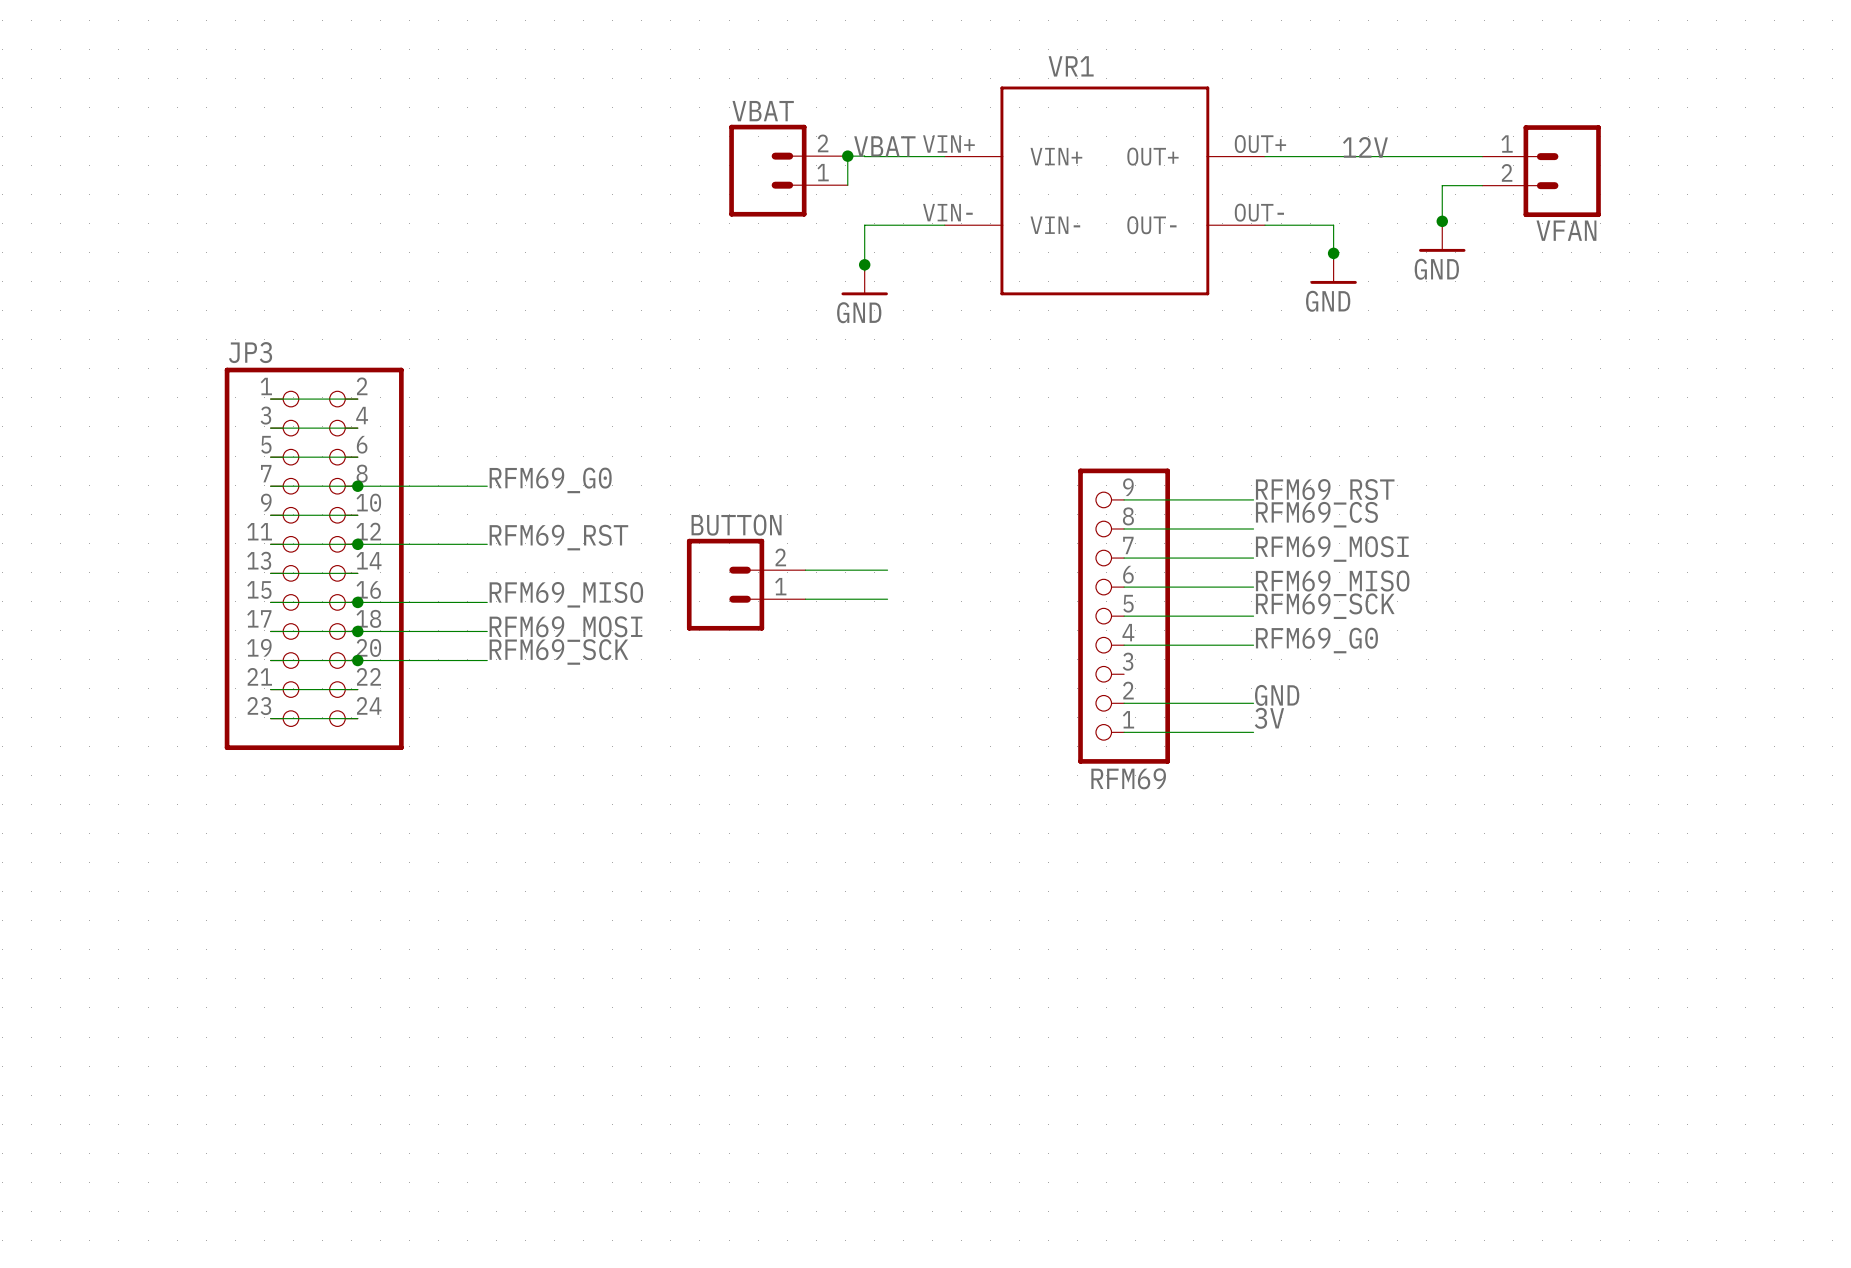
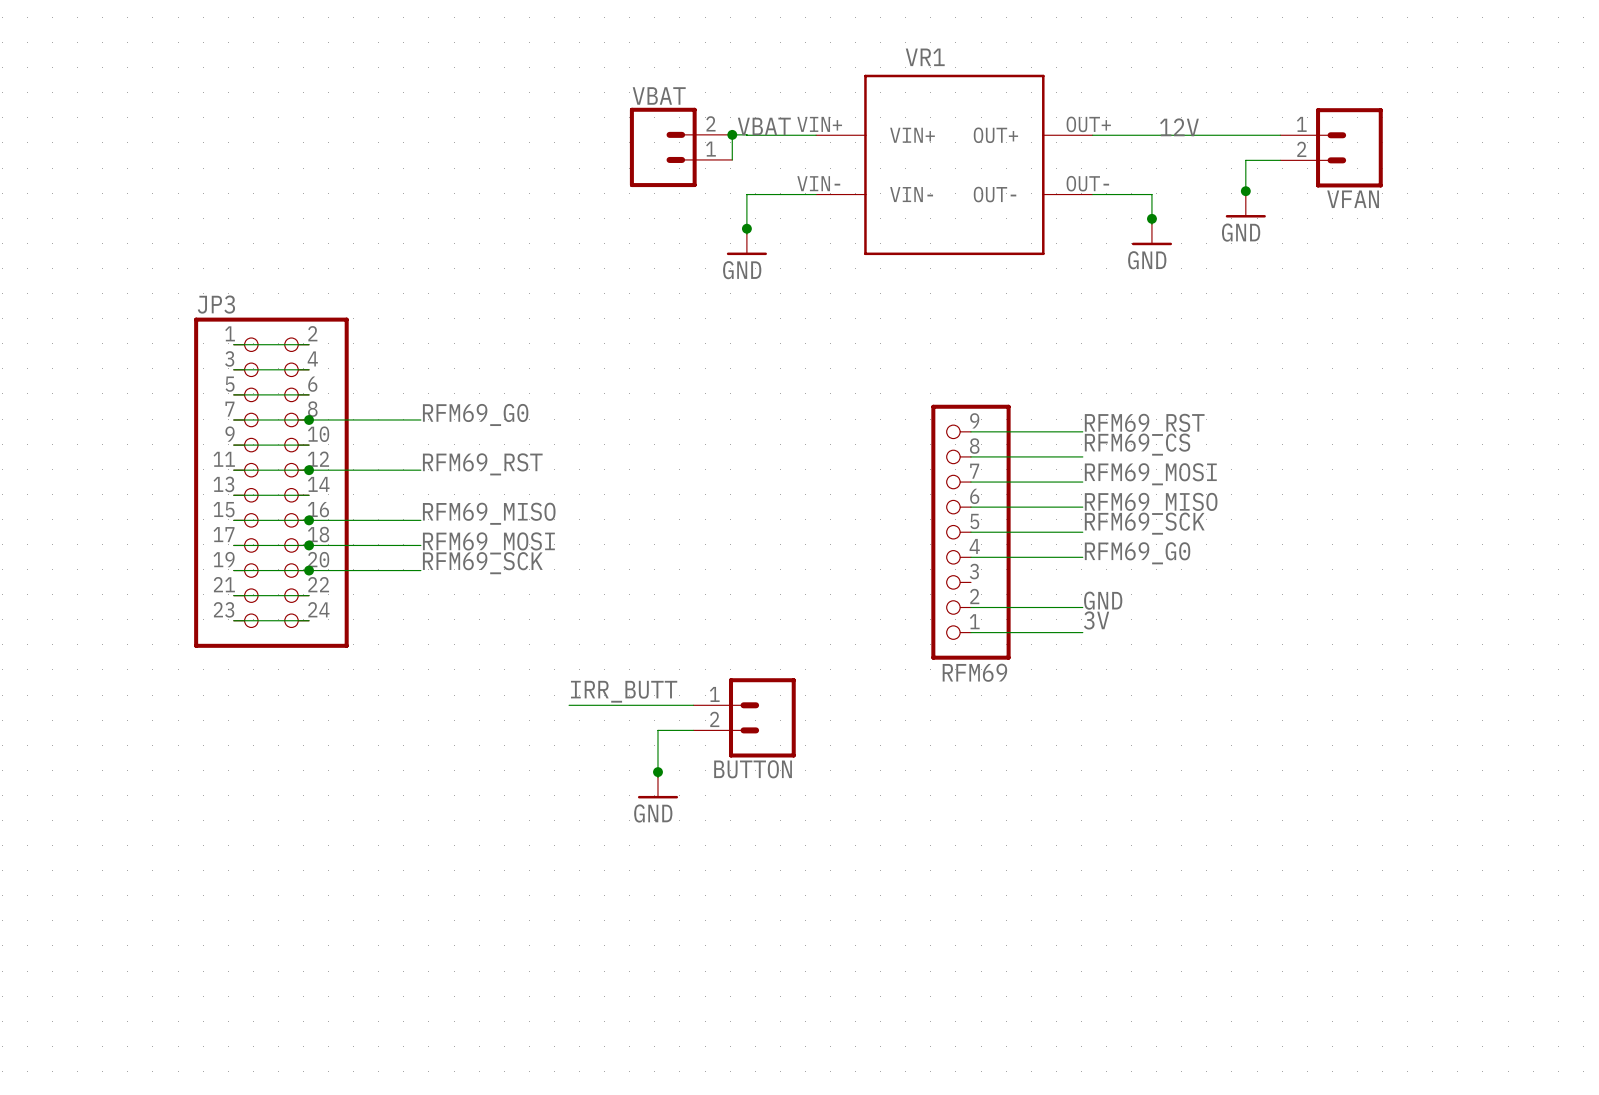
wire: (805, 570) (887, 570) -> none
BUTTON rotation: 0° (725, 584) -> 180° (762, 717)
BUTTON position: (746, 584) -> (744, 717)
wire: (805, 599) (887, 599) -> none
label: none -> IRR_BUTT (624, 691)
wire: none -> (569, 705) (693, 705)
wire: none -> (693, 730) (657, 730) (657, 777)
junction: none -> (657, 772)
power symbol: none -> GND (657, 785)

